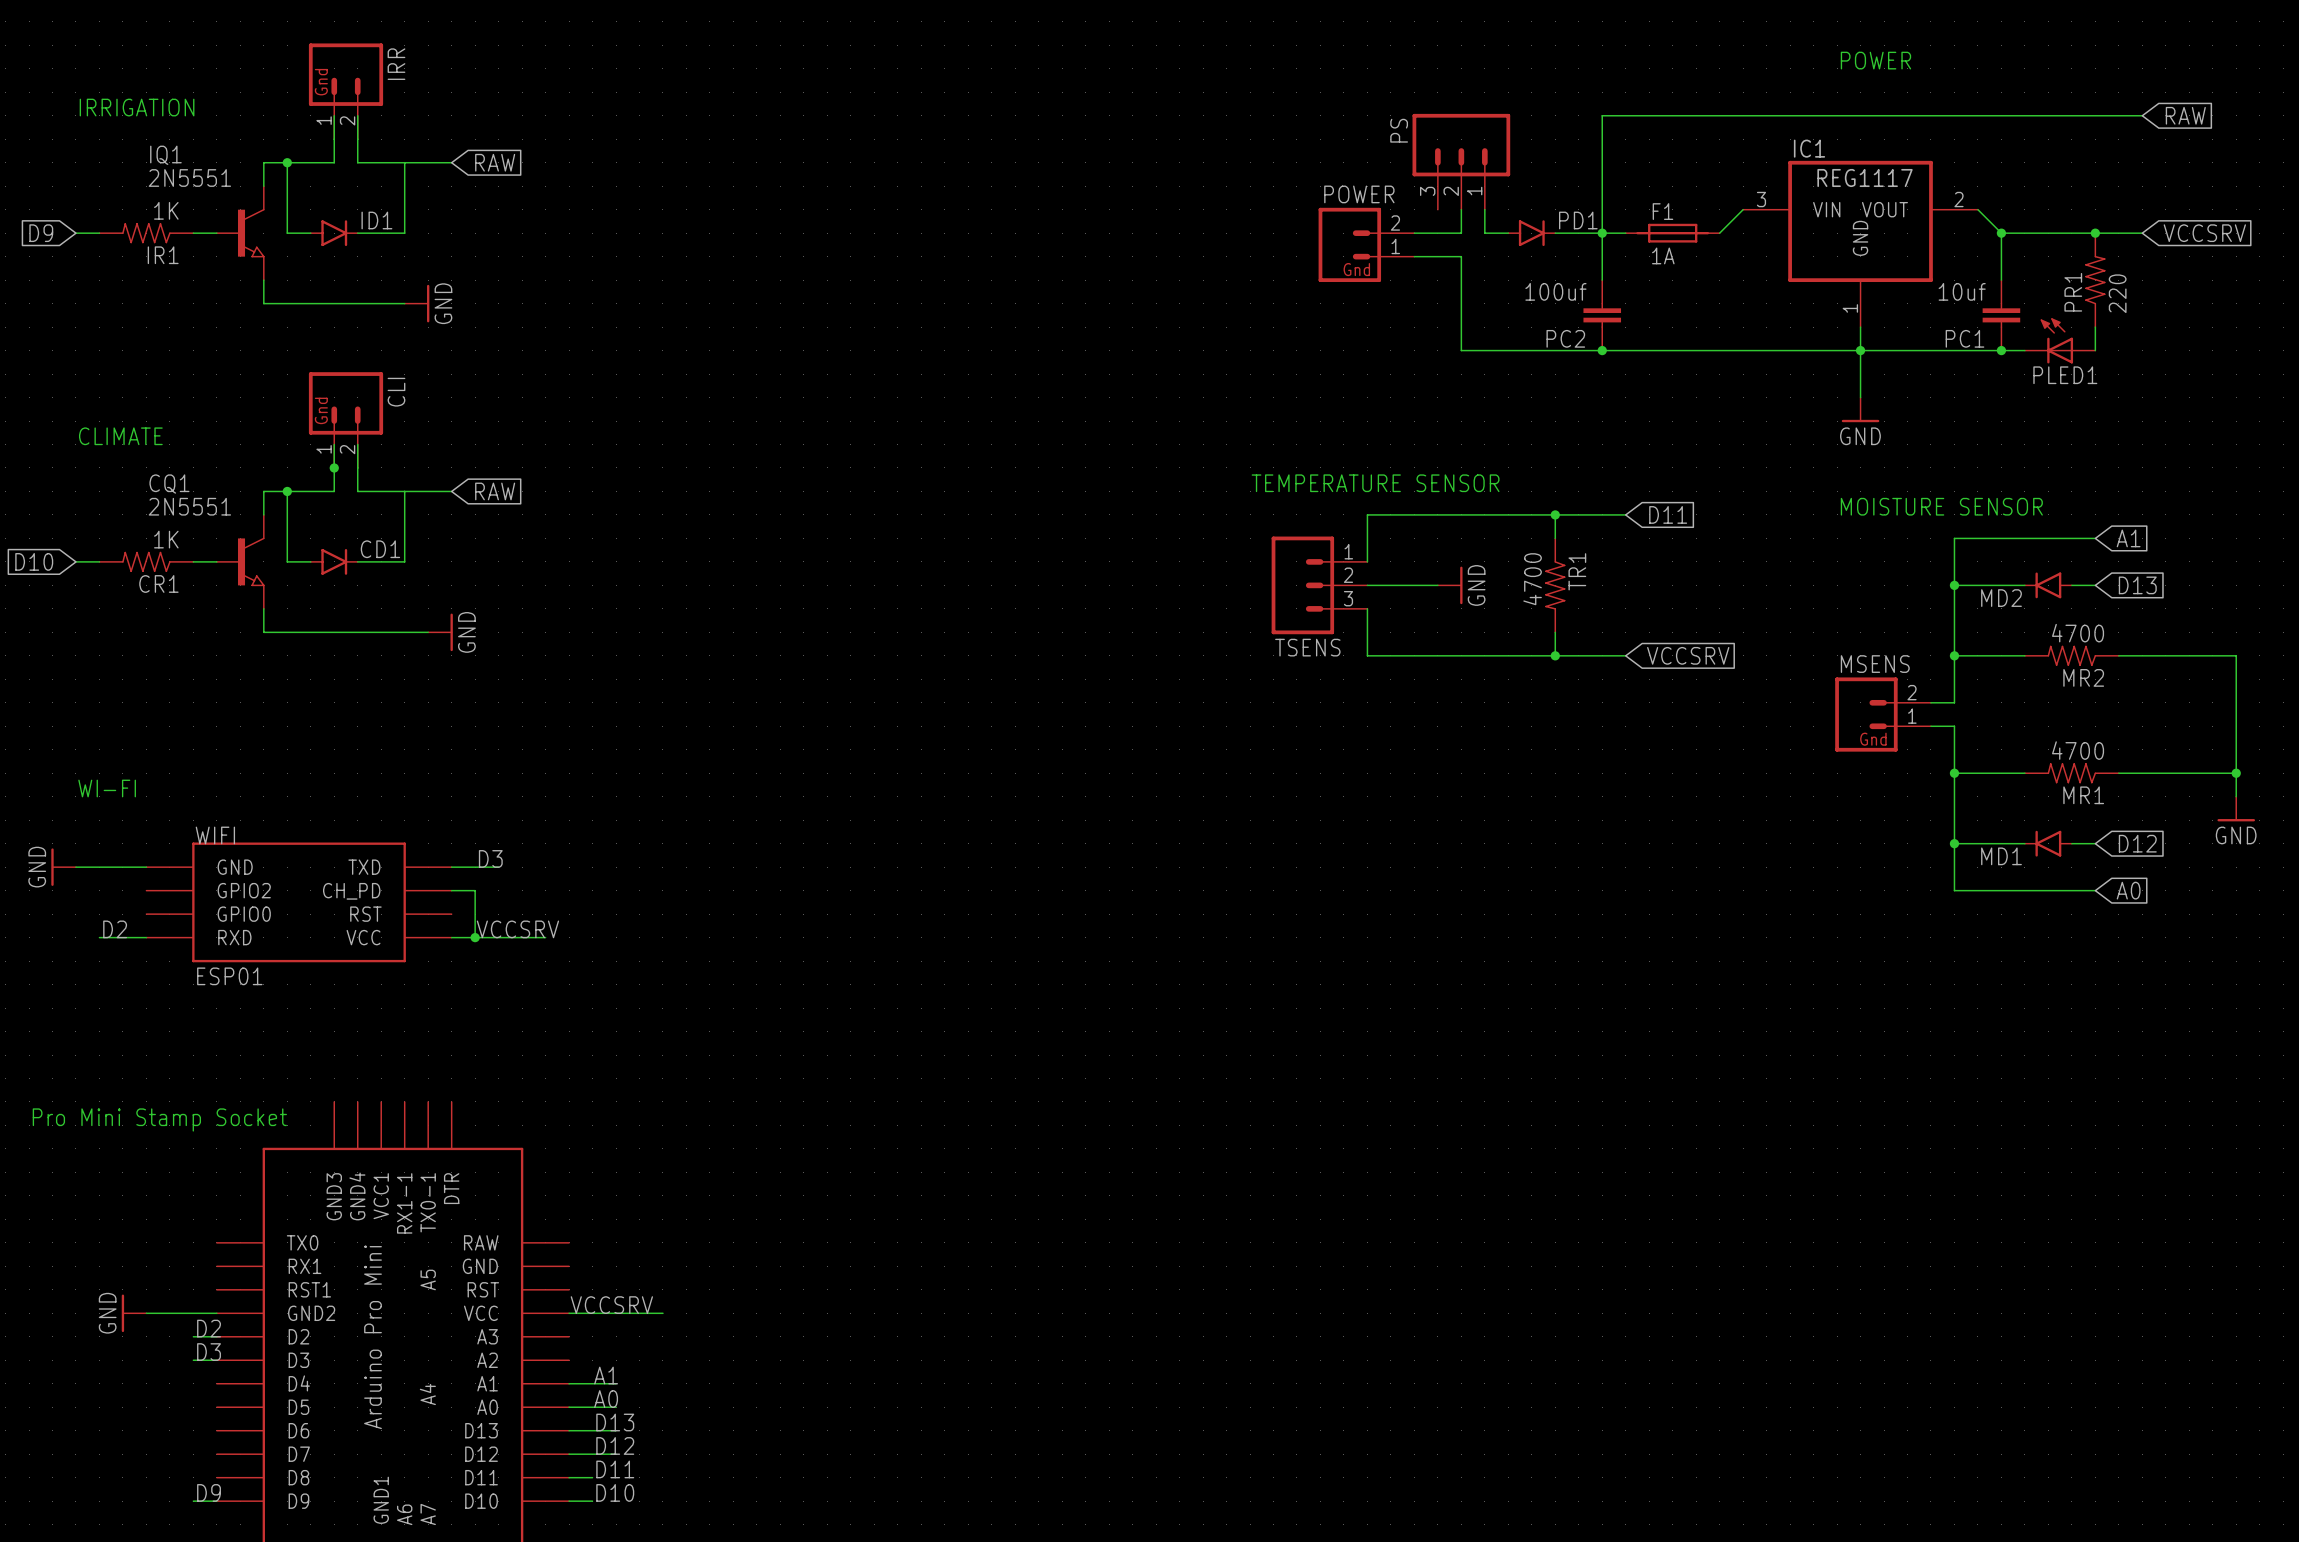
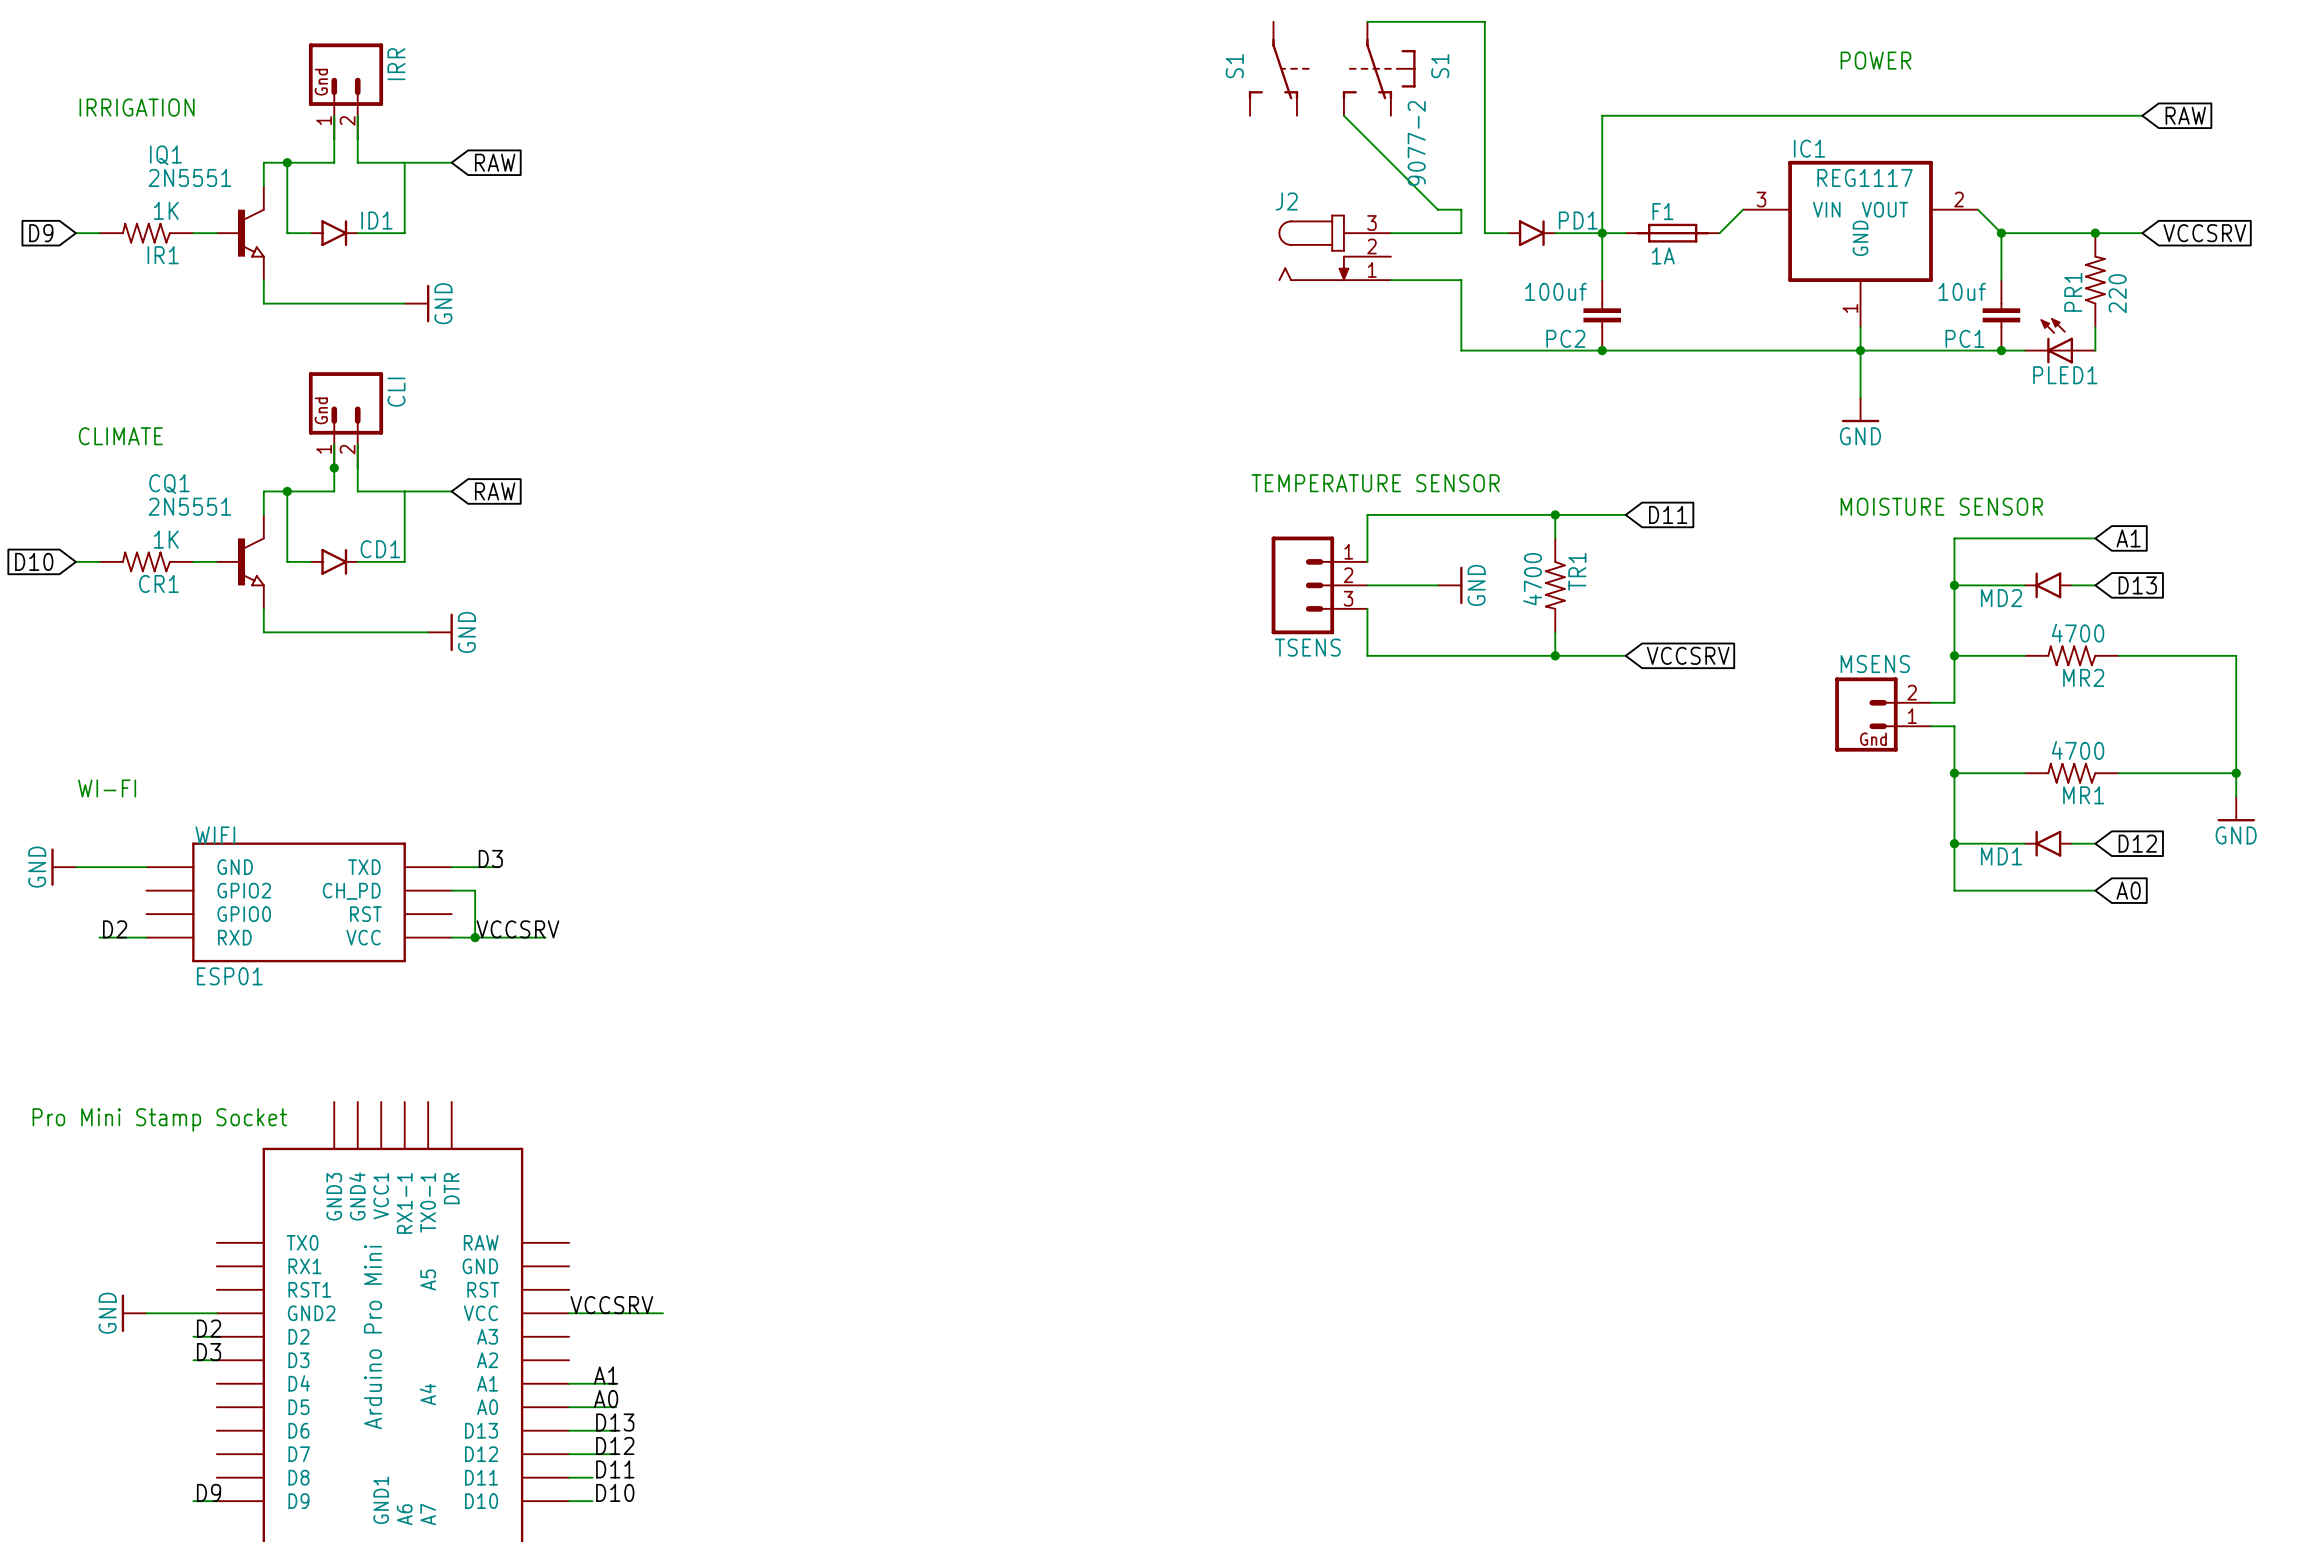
wire: none -> (1367, 21) (1484, 21) (1484, 209)
S1: none -> (1279, 68)
S1: none -> 9077-2 (1379, 68)
wire: none -> (1343, 115) (1437, 209) (1461, 209)
PS: (1461, 161) -> none
POWER: (1366, 244) -> none
J2: none -> (1334, 247)
wire: (1414, 256) (1461, 256) (1461, 280) -> (1390, 280) (1461, 280)

